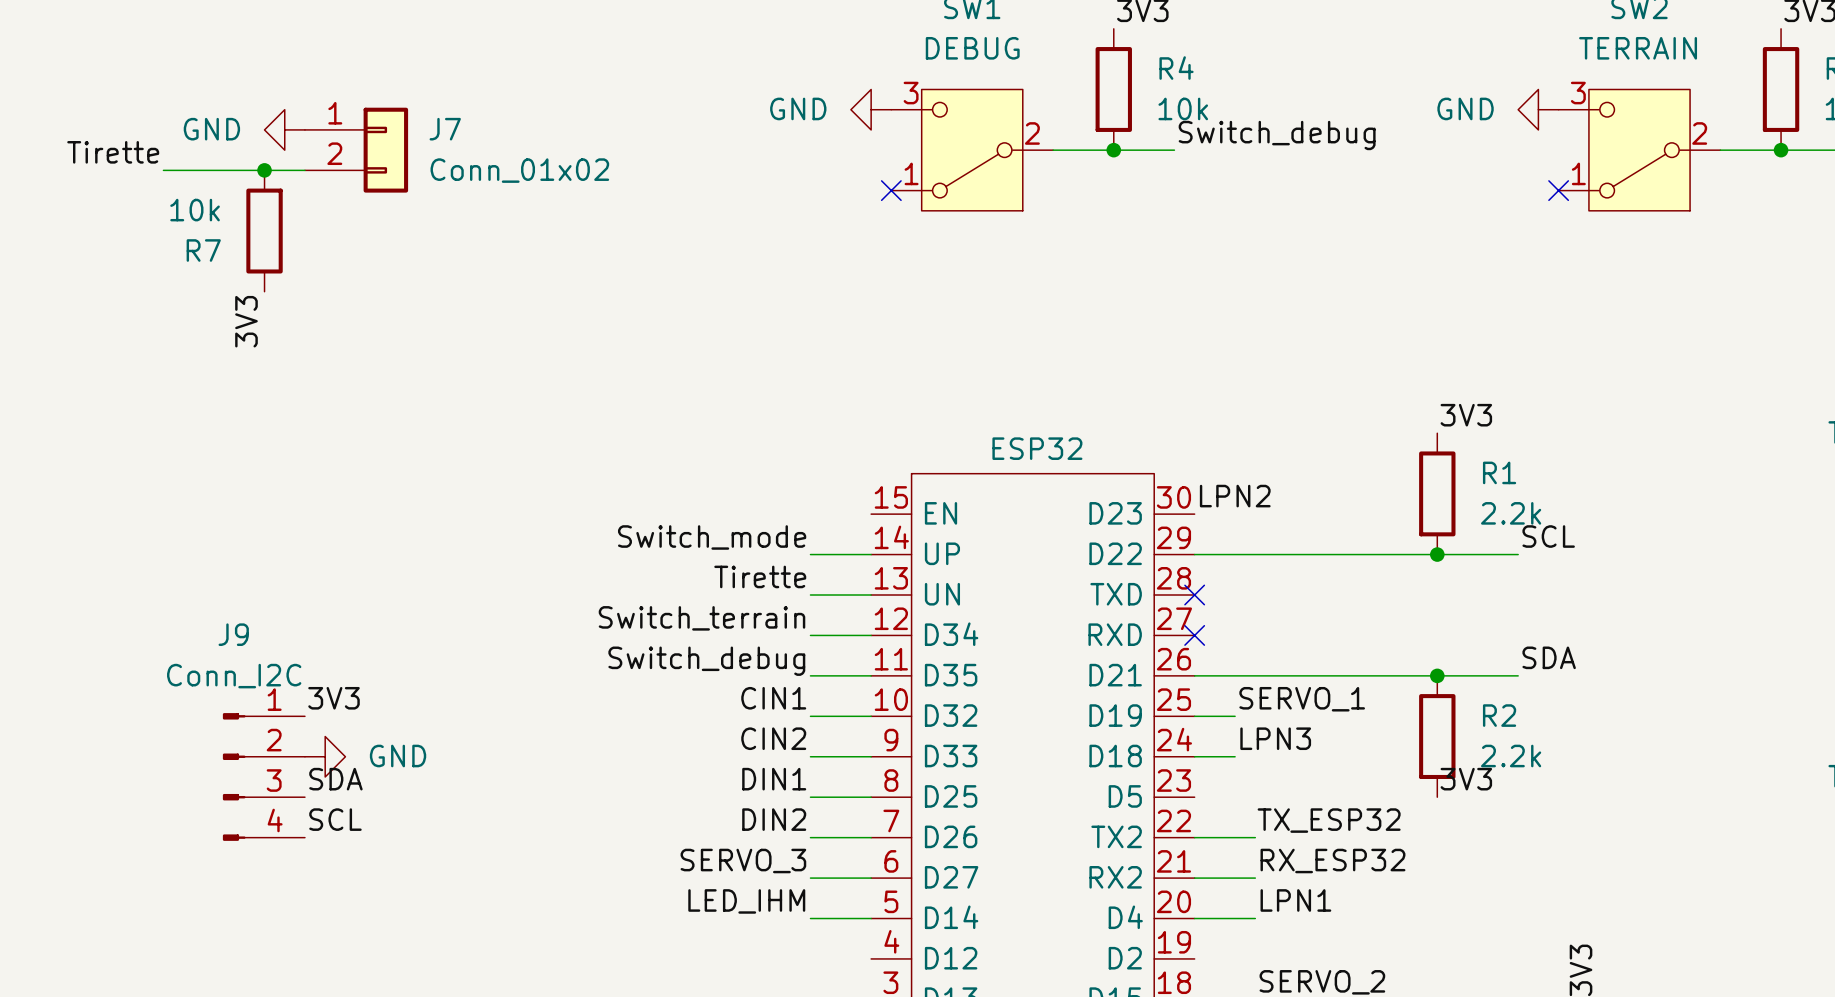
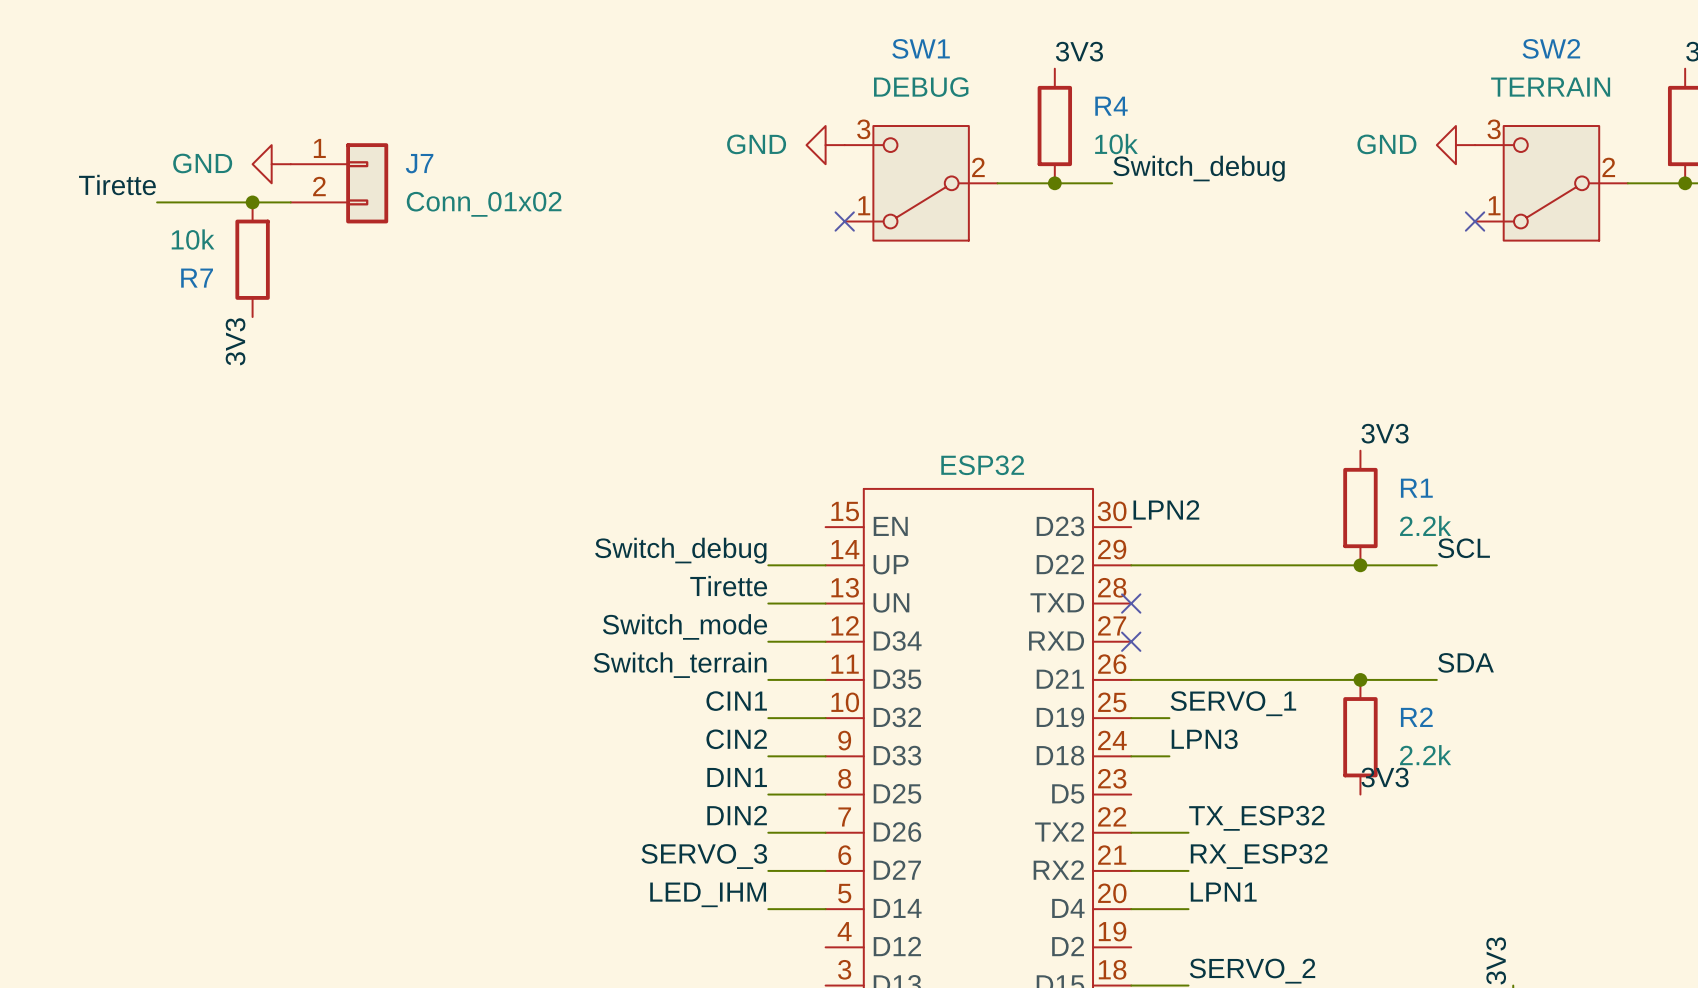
label: Switch_mode (712, 537) -> Switch_debug (680, 550)
label: Switch_terrain (702, 618) -> Switch_mode (684, 626)
label: Switch_debug (706, 661) -> Switch_terrain (680, 665)
label: 3V3 (334, 698) -> none
power symbol: GND (325, 756) -> none
J9: Conn_I2C (263, 776) -> none
label: SDA (335, 779) -> none
label: SCL (335, 819) -> none

